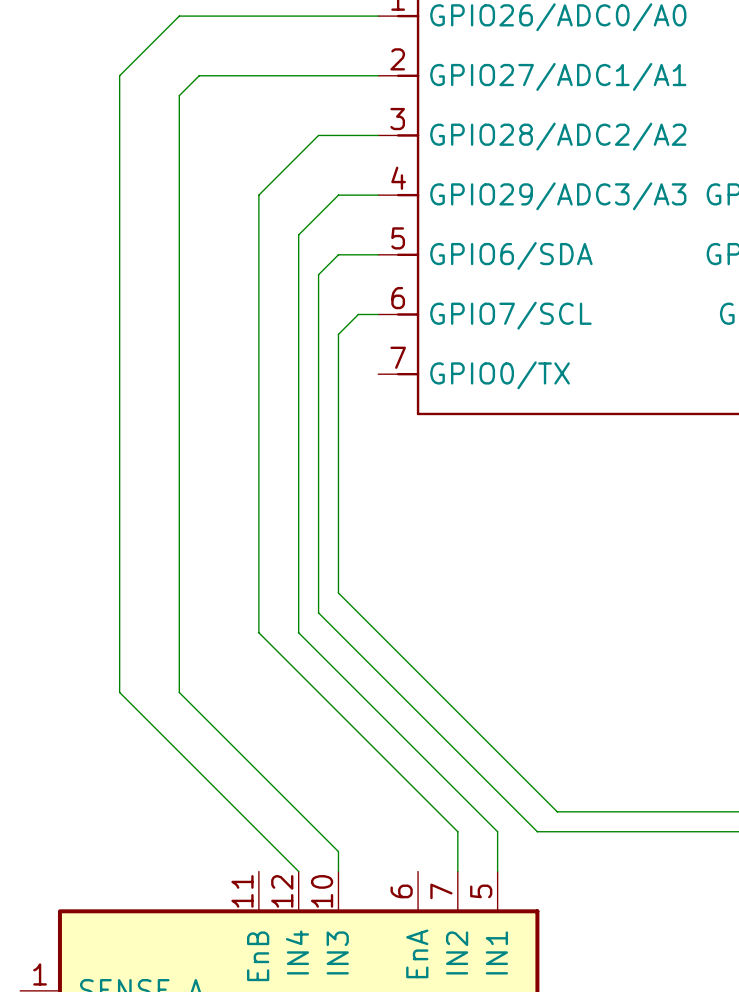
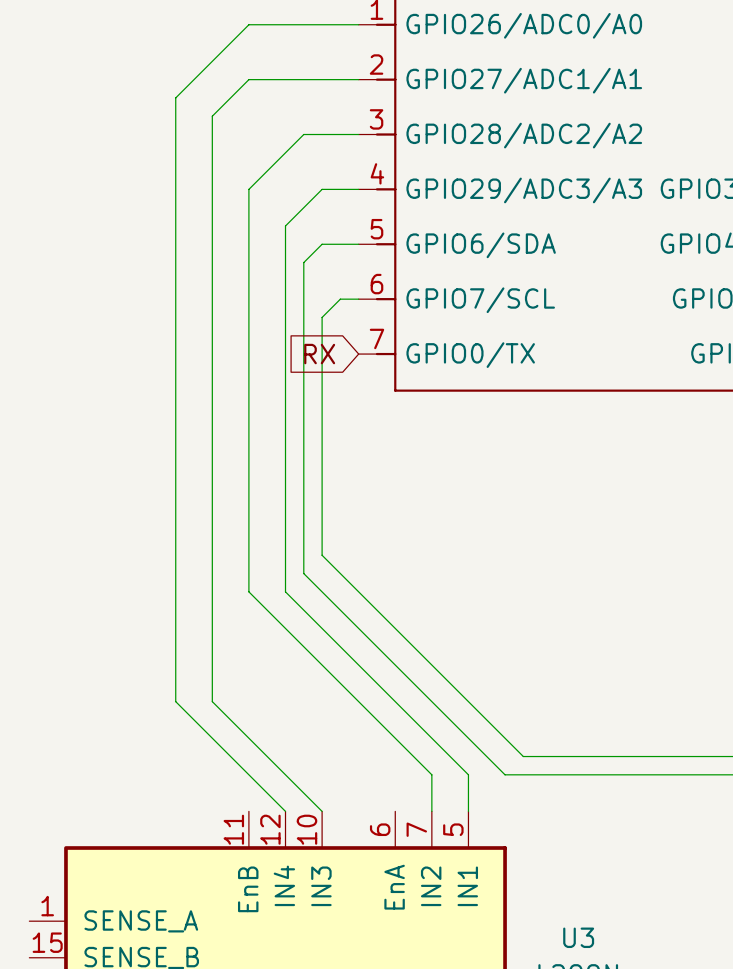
wire: (258, 16) (179, 16) (119, 75) (119, 692) (179, 752) -> none
wire: (199, 75) (258, 75) -> (194, 79) (248, 24)
wire: none -> (248, 79) (212, 116) (212, 701) (322, 811)
global label: none -> RX (319, 354)
wire: (179, 692) (338, 851) (338, 871) -> (175, 646) (175, 701)

